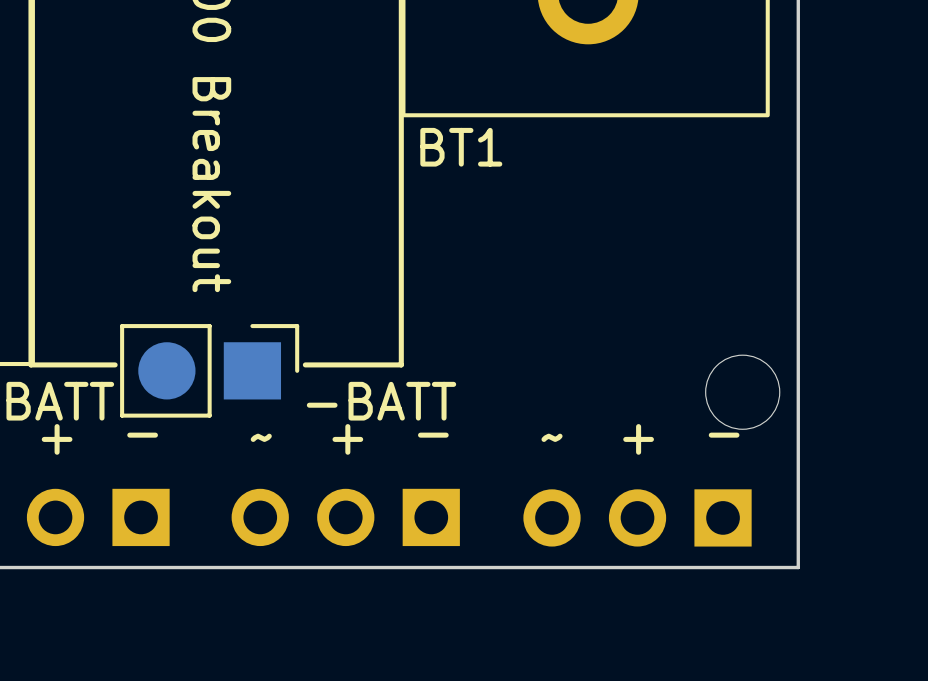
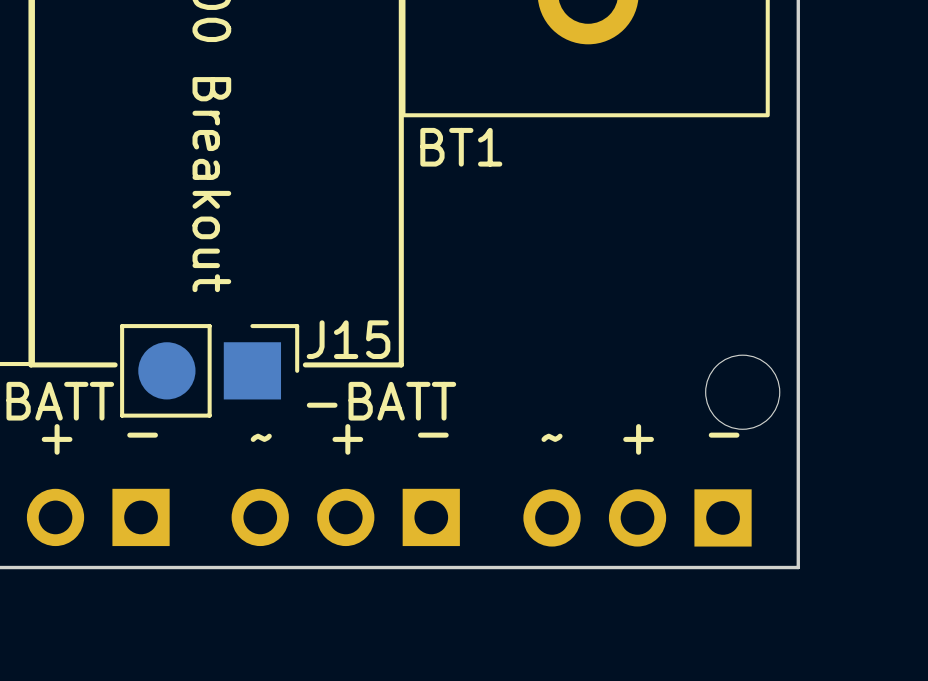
J15 name: none -> J15 (348, 339)

